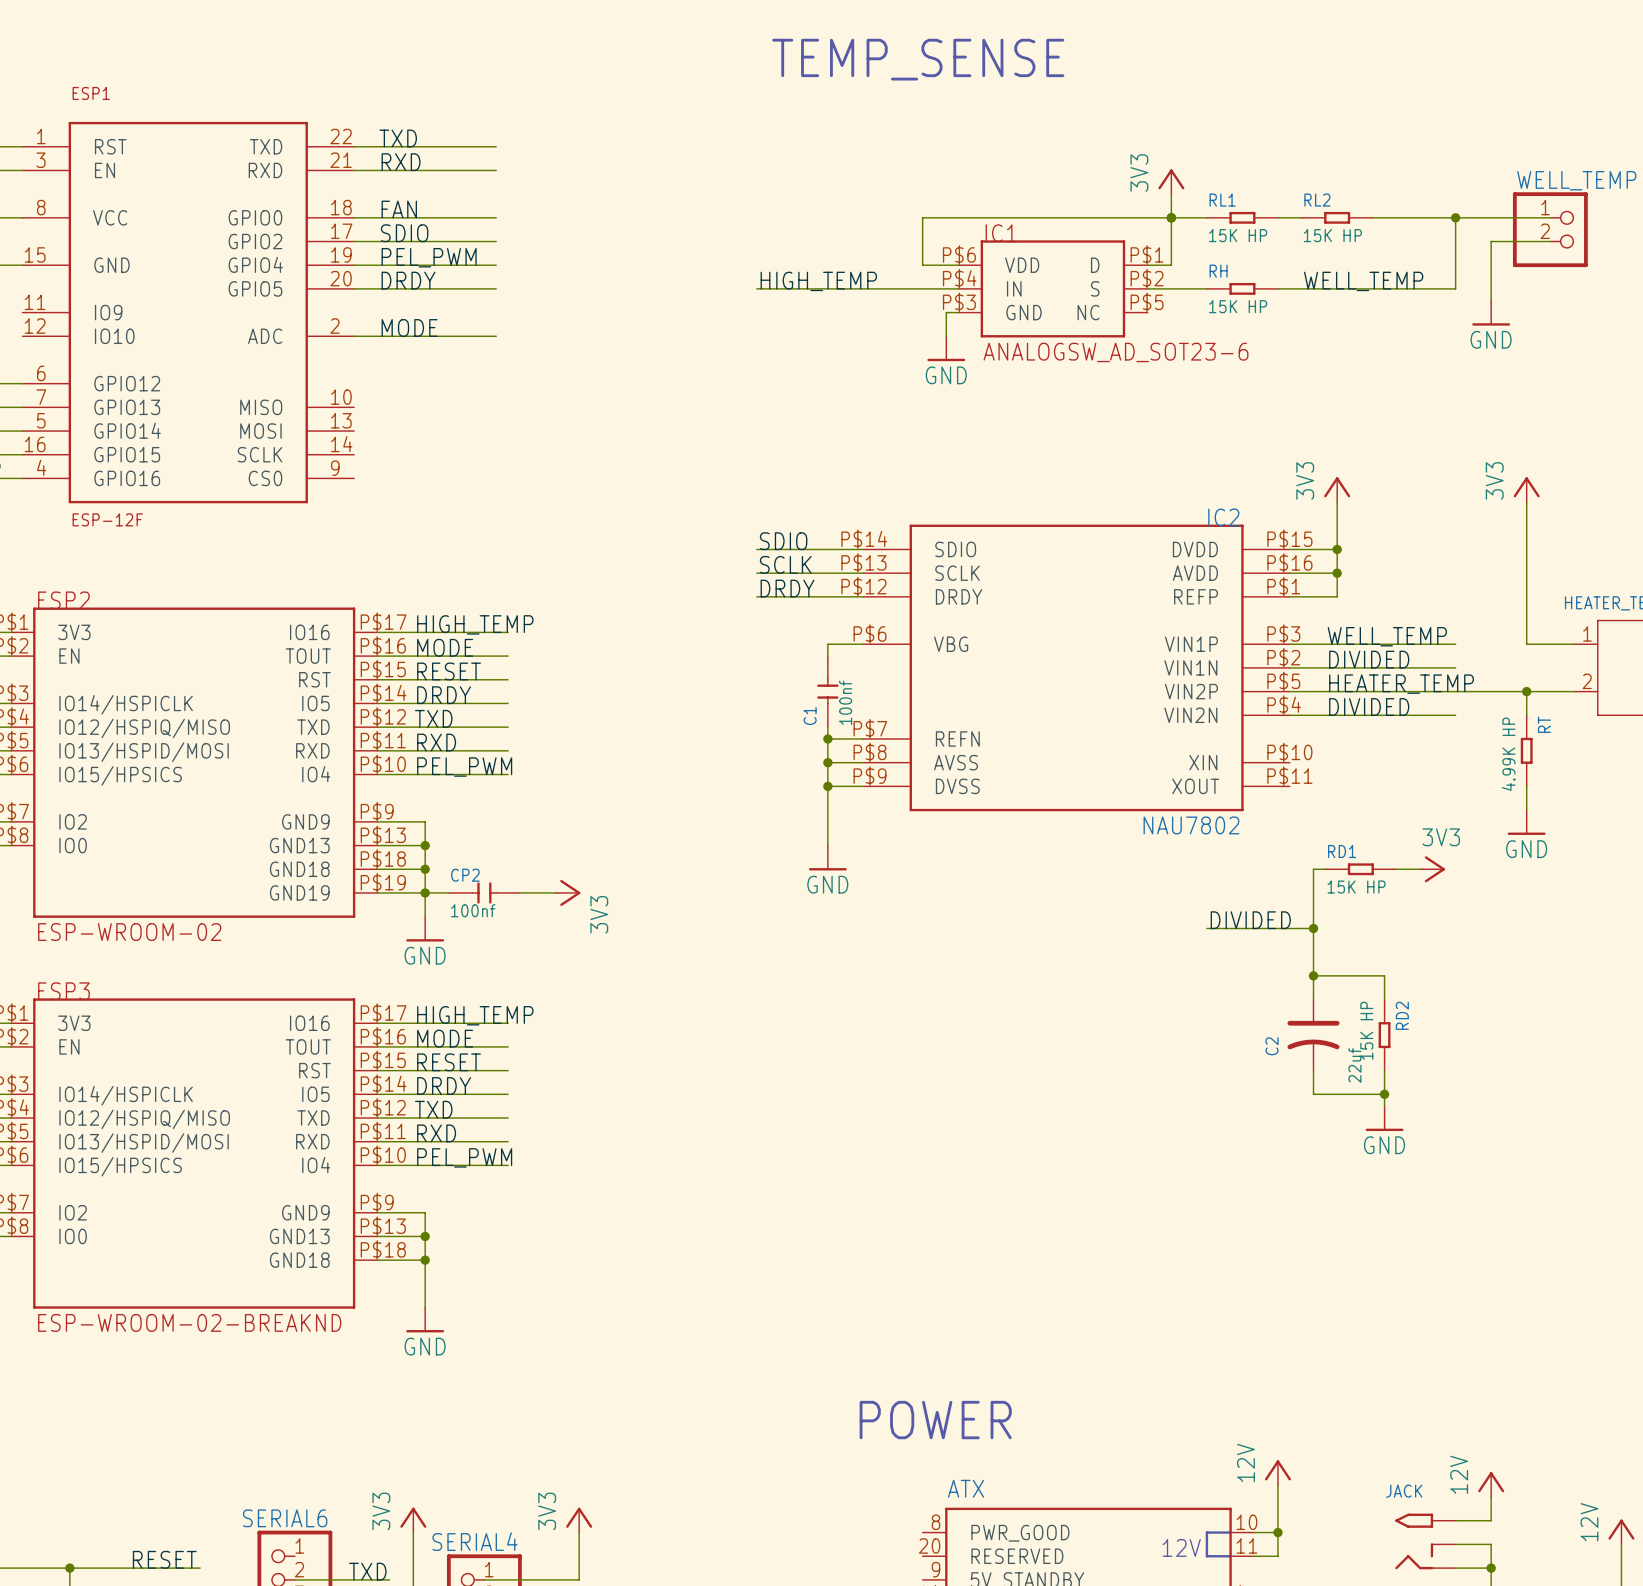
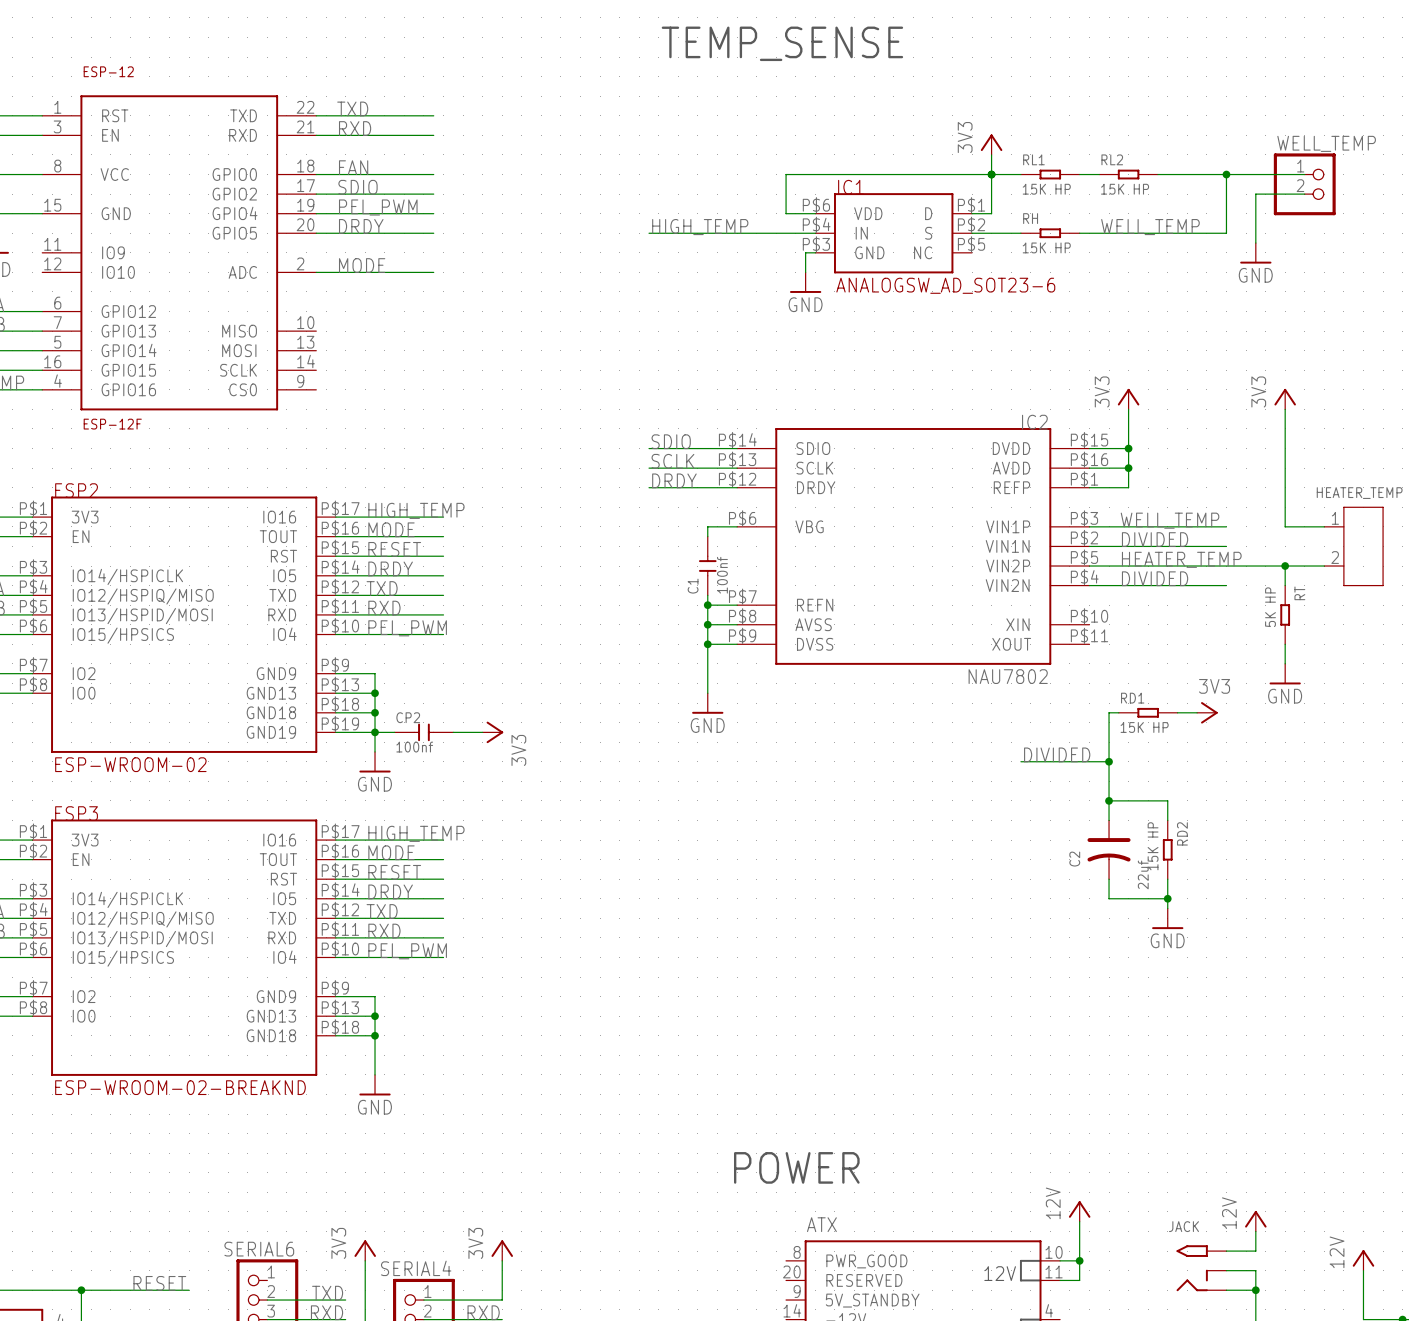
ESP1 name: ESP1 (91, 93) -> ESP-12 (108, 71)
RT value: 4.99K HP (1508, 754) -> 5K HP (1270, 607)

